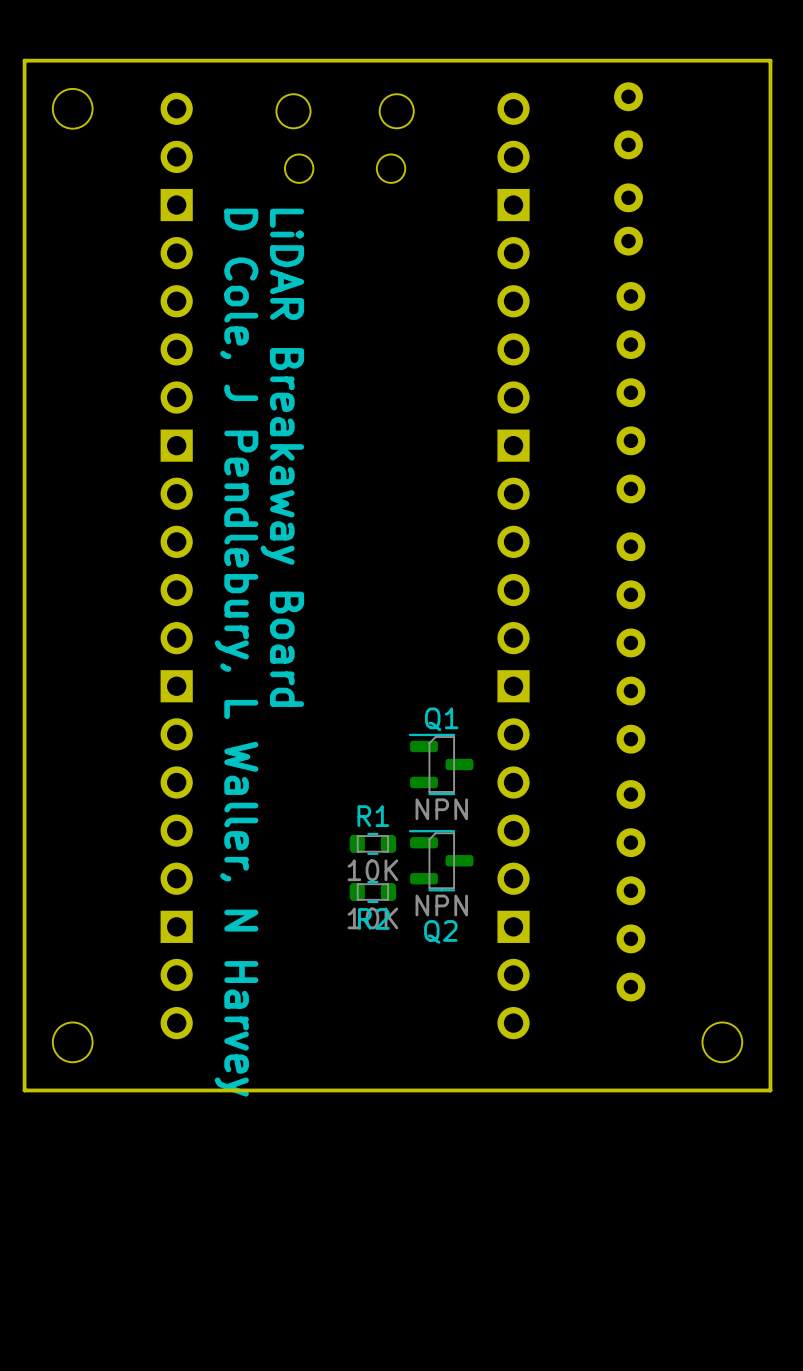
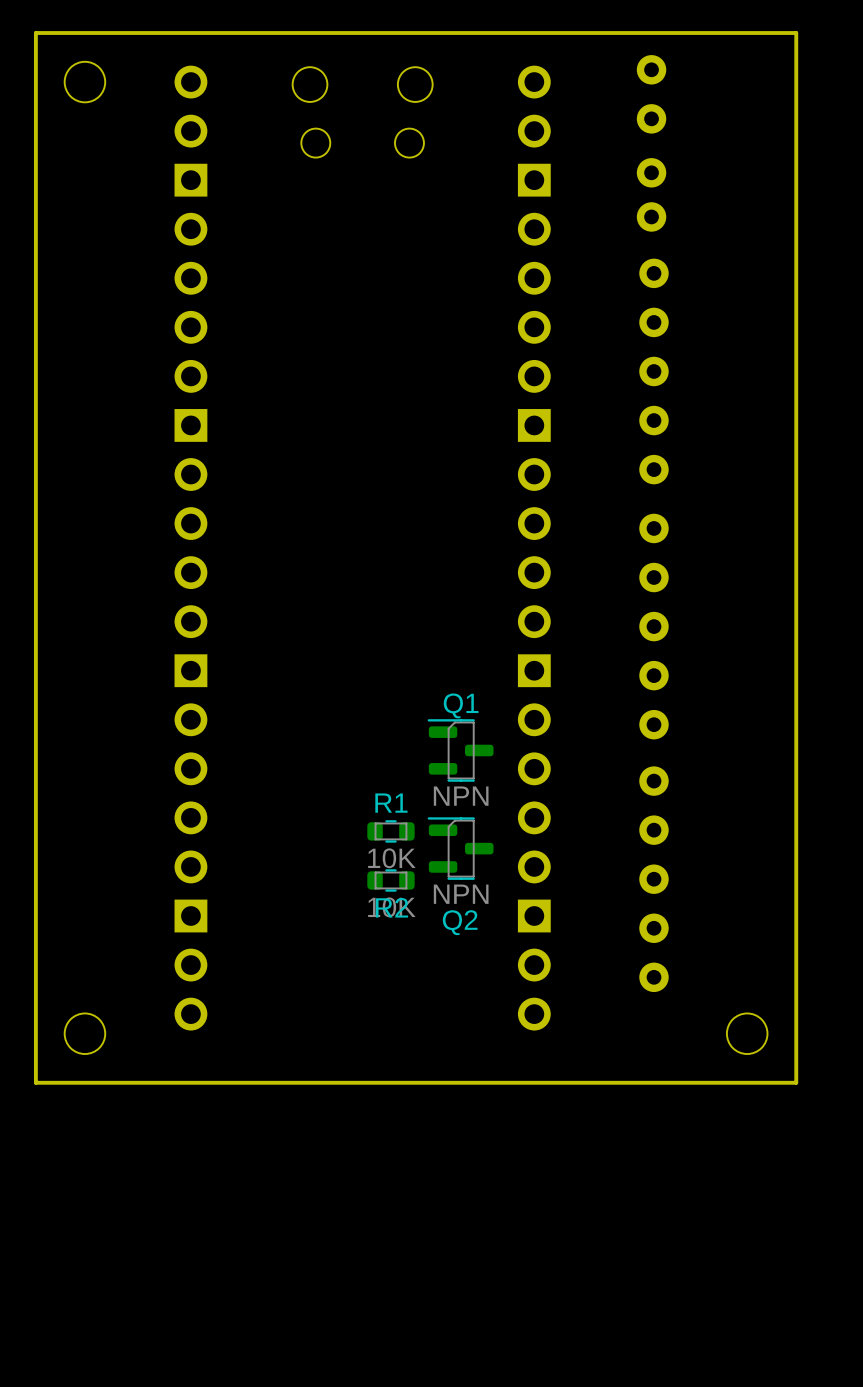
text: LiDAR Breakaway Board (282, 457) -> none
text: D Cole, J Pendlebury, L Waller, N Harvey (236, 652) -> none

